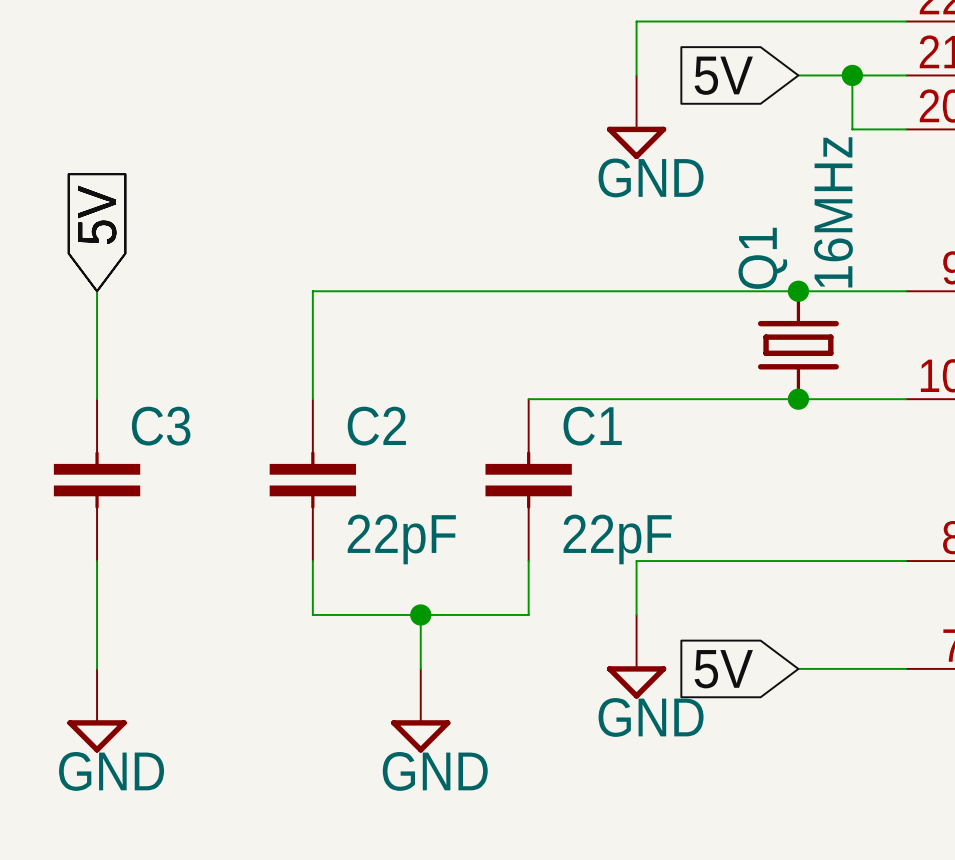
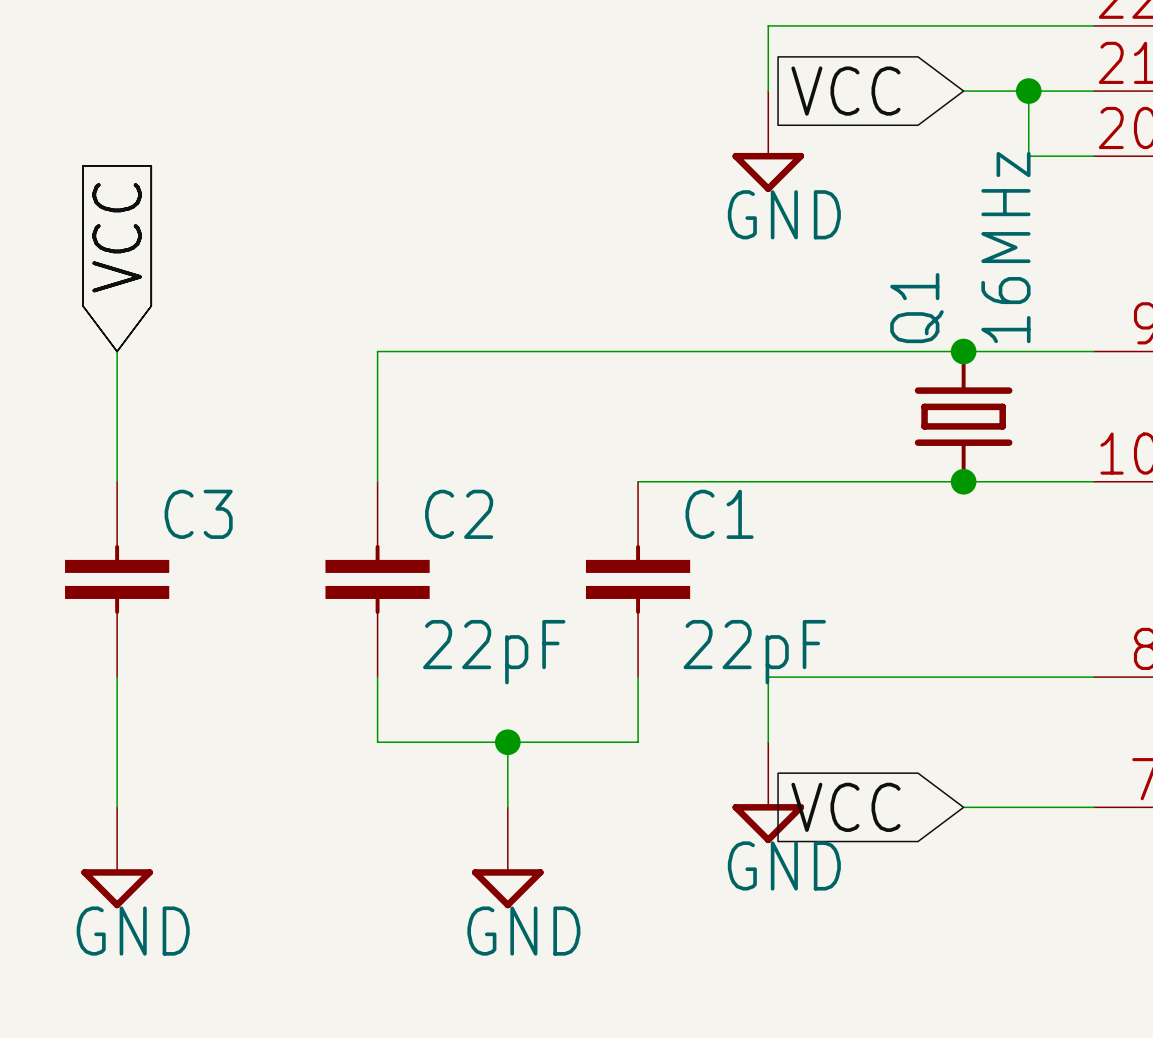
global label: 5V (723, 75) -> VCC (845, 91)
global label: 5V (97, 214) -> VCC (117, 237)
global label: 5V (723, 669) -> VCC (845, 807)

